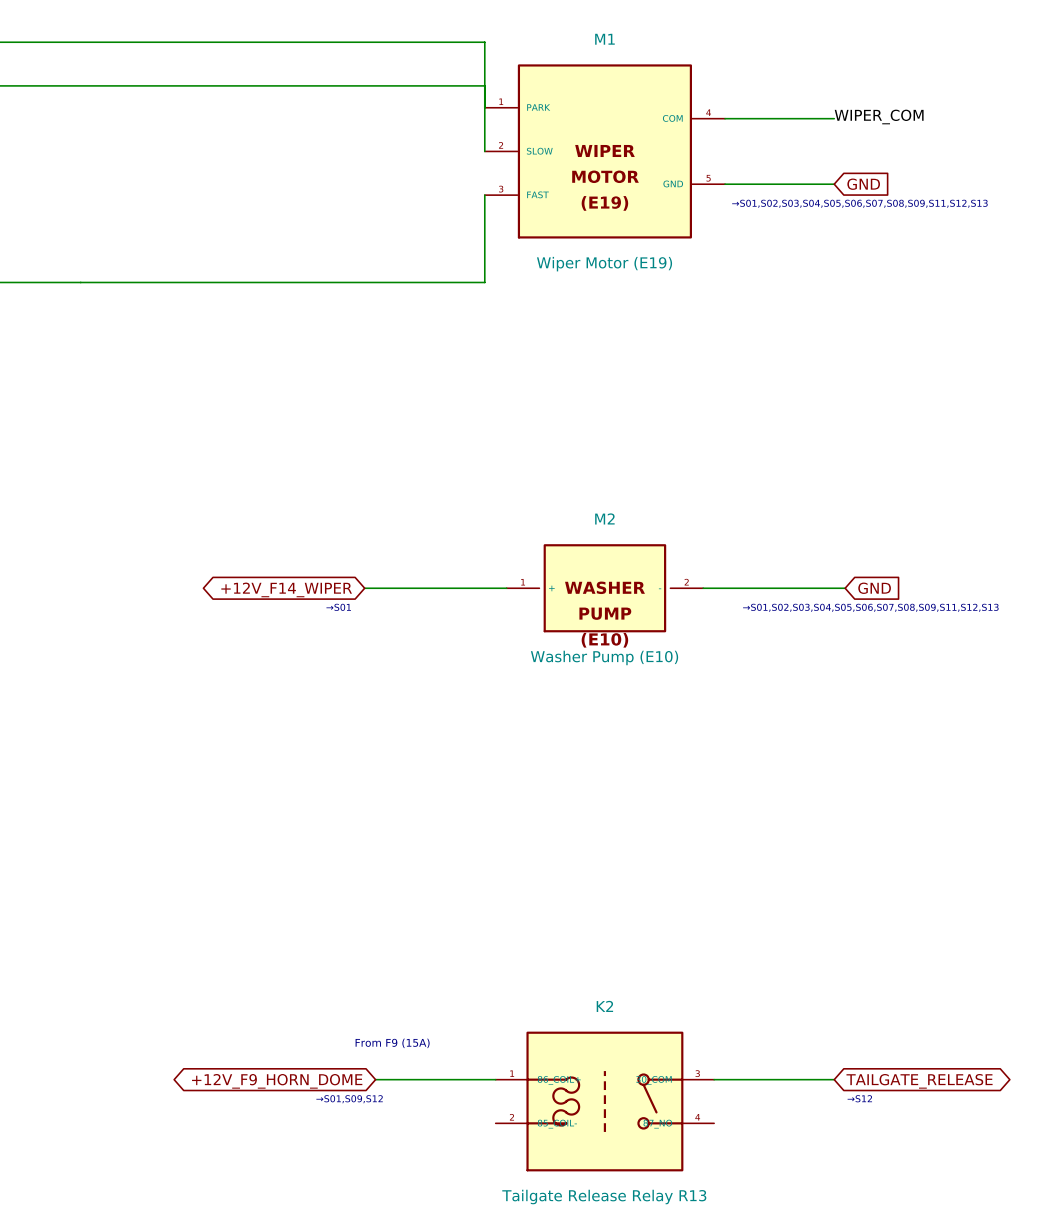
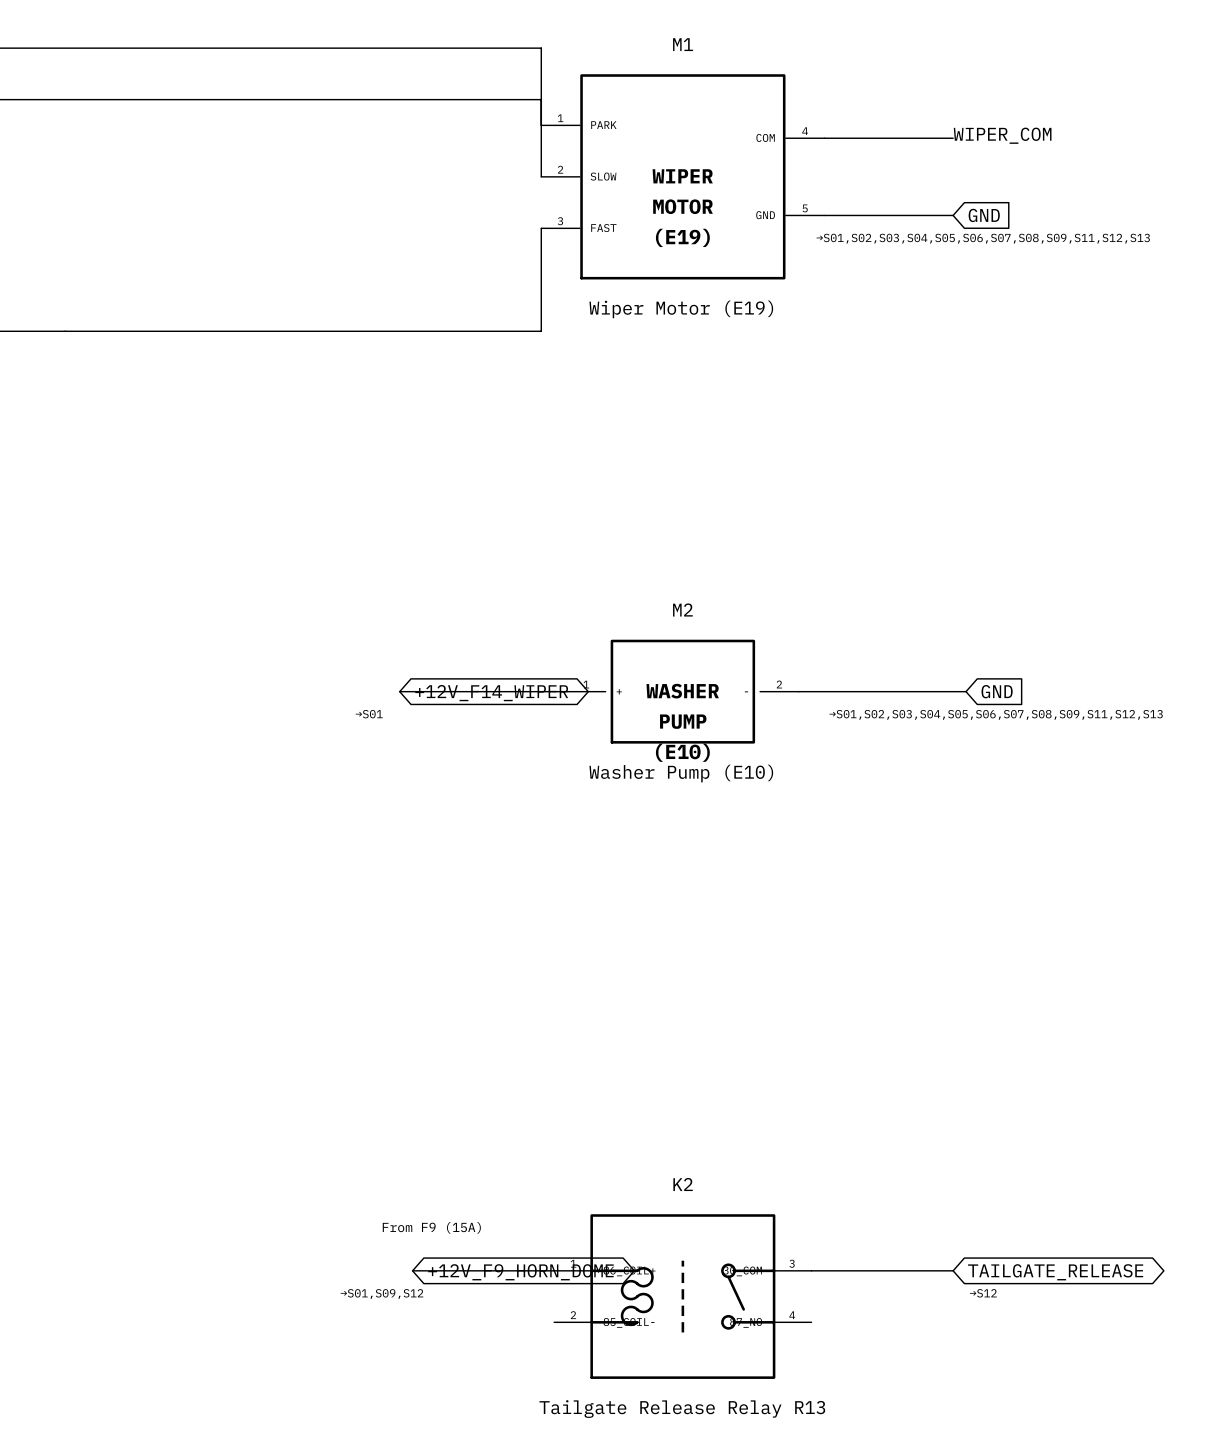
global label rotation: 0° (286, 589) -> 180° (491, 693)
global label rotation: 0° (277, 1081) -> 180° (520, 1272)

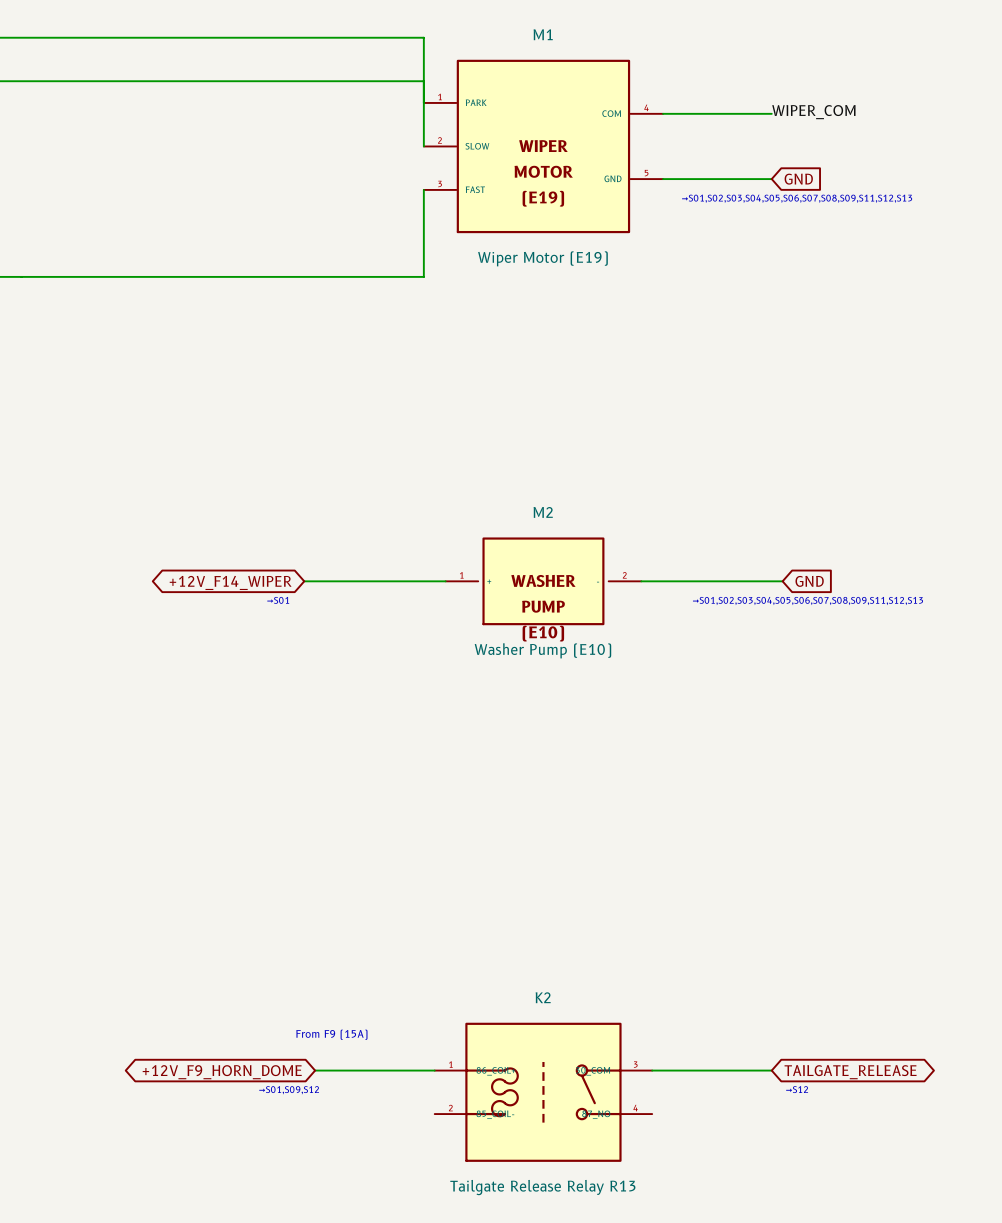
global label rotation: 0° (491, 693) -> 180° (230, 582)
global label rotation: 0° (520, 1272) -> 180° (222, 1072)
global label position: +12V_F9_HORN_DOME (520, 1272) -> +12V_F9_HORN_DOME (222, 1072)

